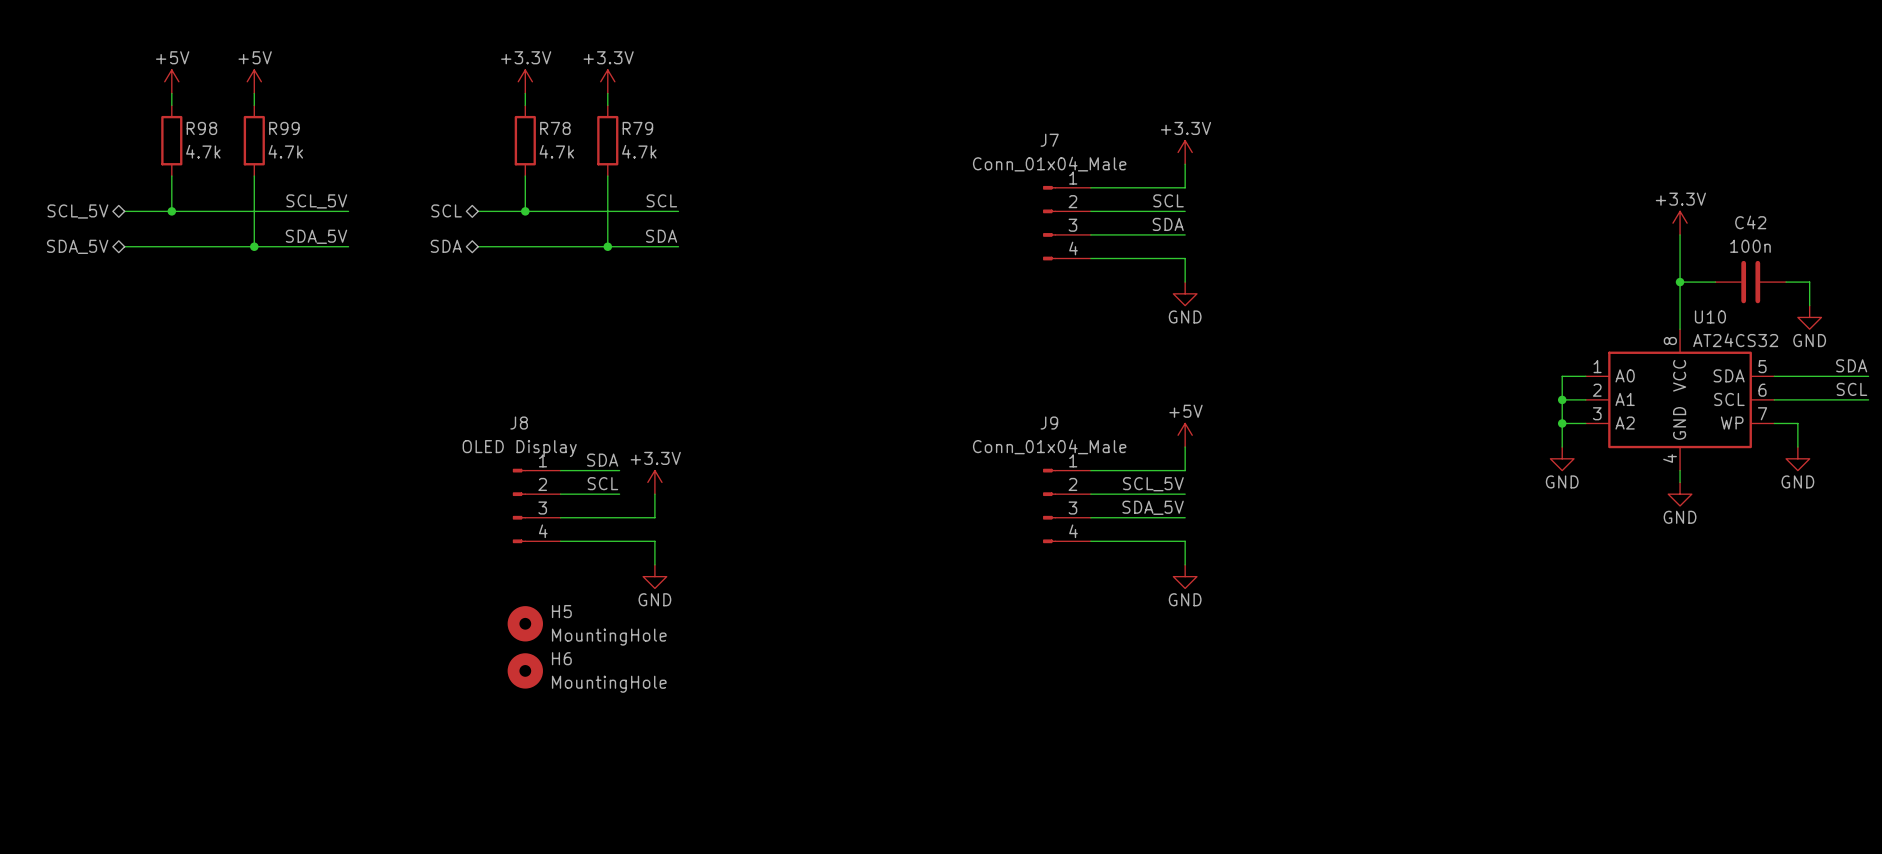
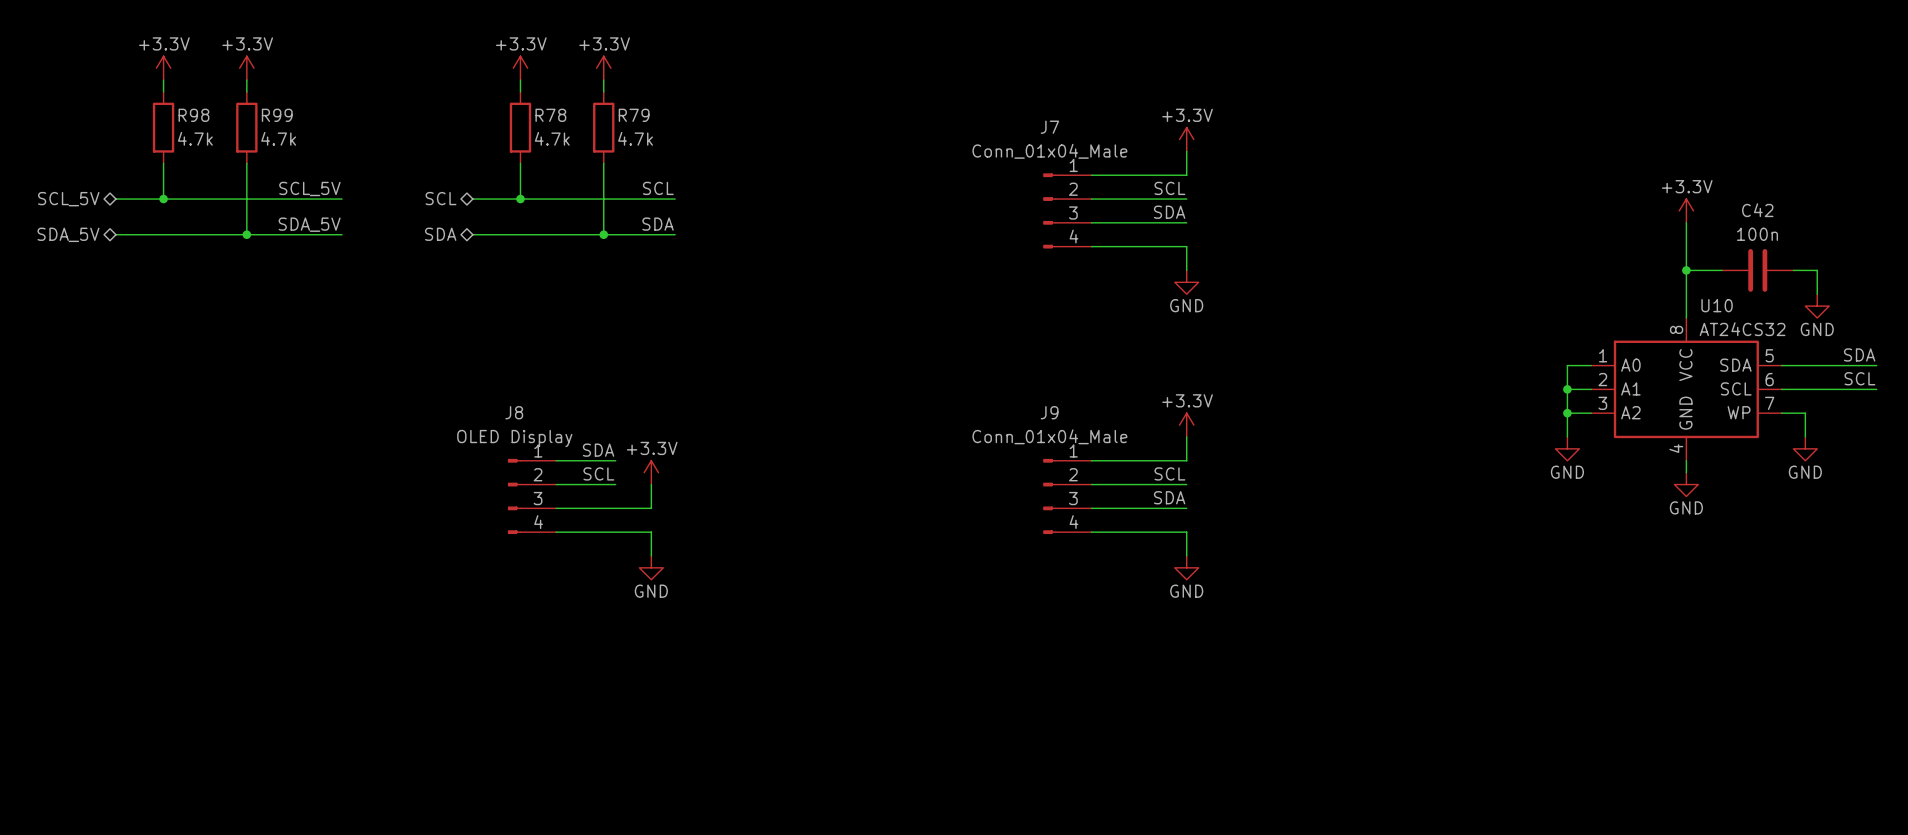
power symbol: +5V (171, 81) -> +3.3V (163, 68)
power symbol: +5V (254, 81) -> +3.3V (246, 68)
power symbol: +5V (1185, 435) -> +3.3V (1186, 425)
label: SCL_5V (1153, 484) -> SCL (1169, 473)
label: SDA_5V (1153, 507) -> SDA (1169, 497)
H5: MountingHole (525, 623) -> none
H6: MountingHole (525, 670) -> none

